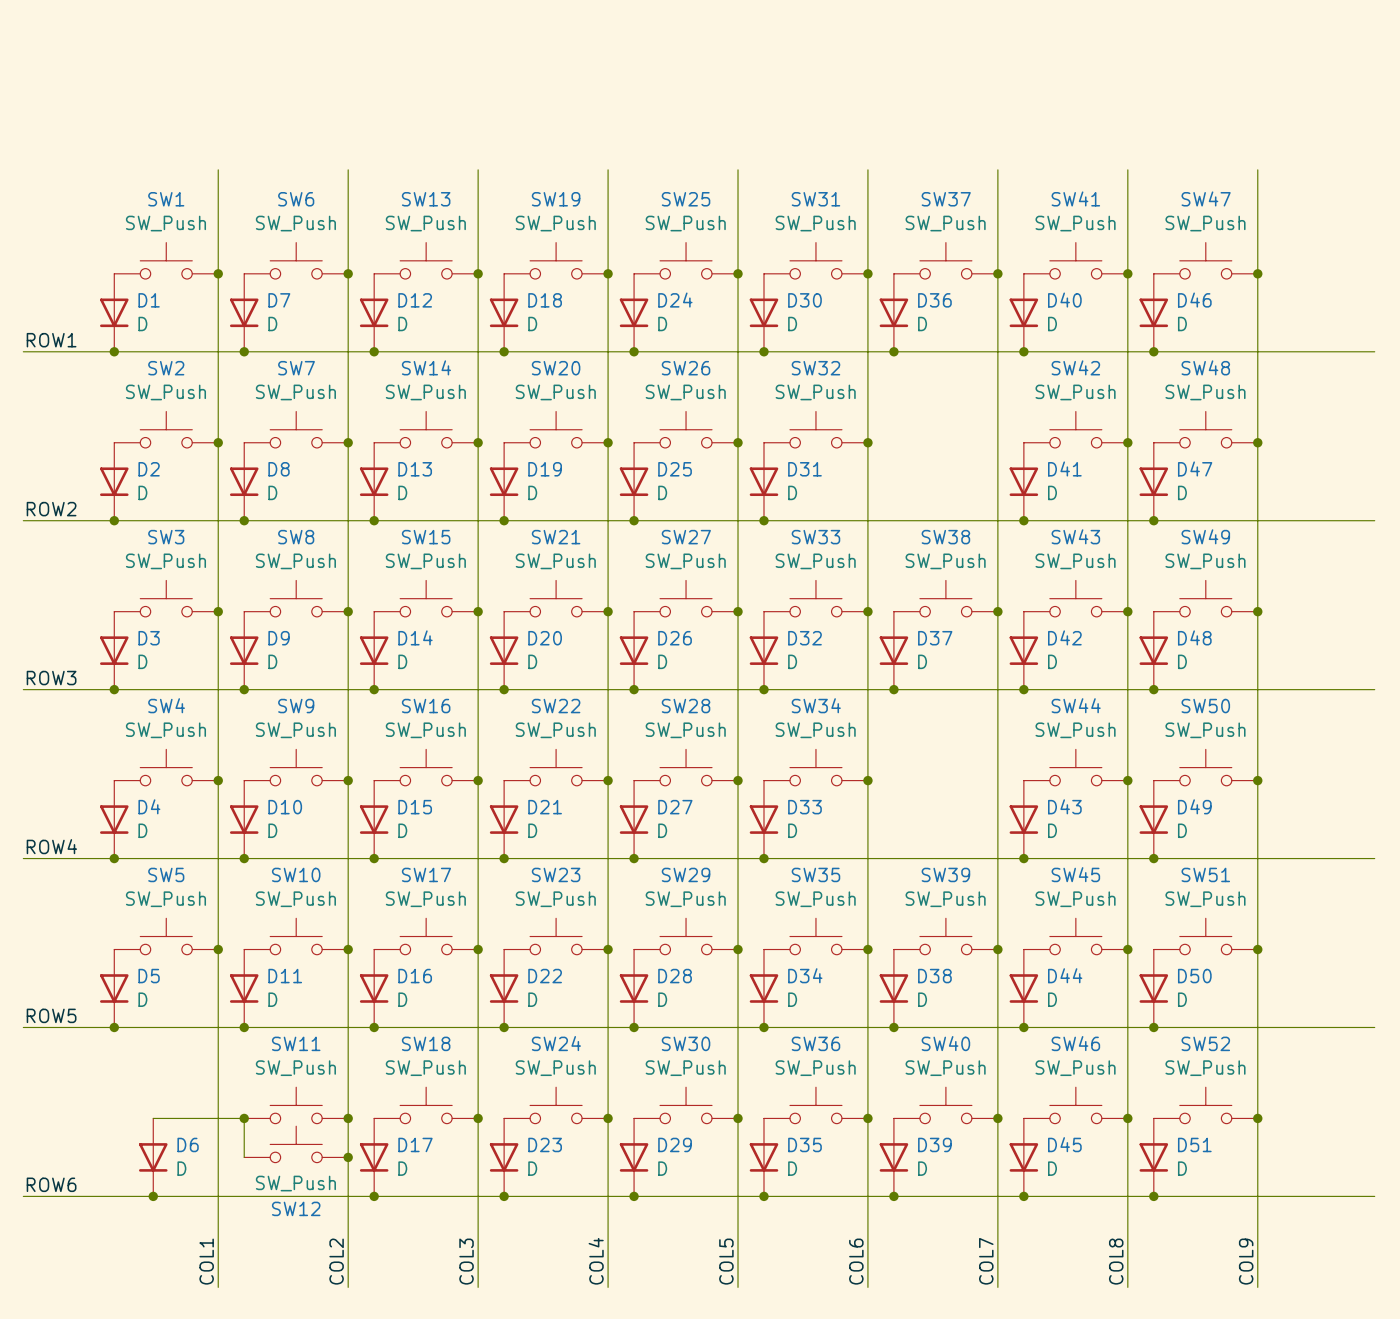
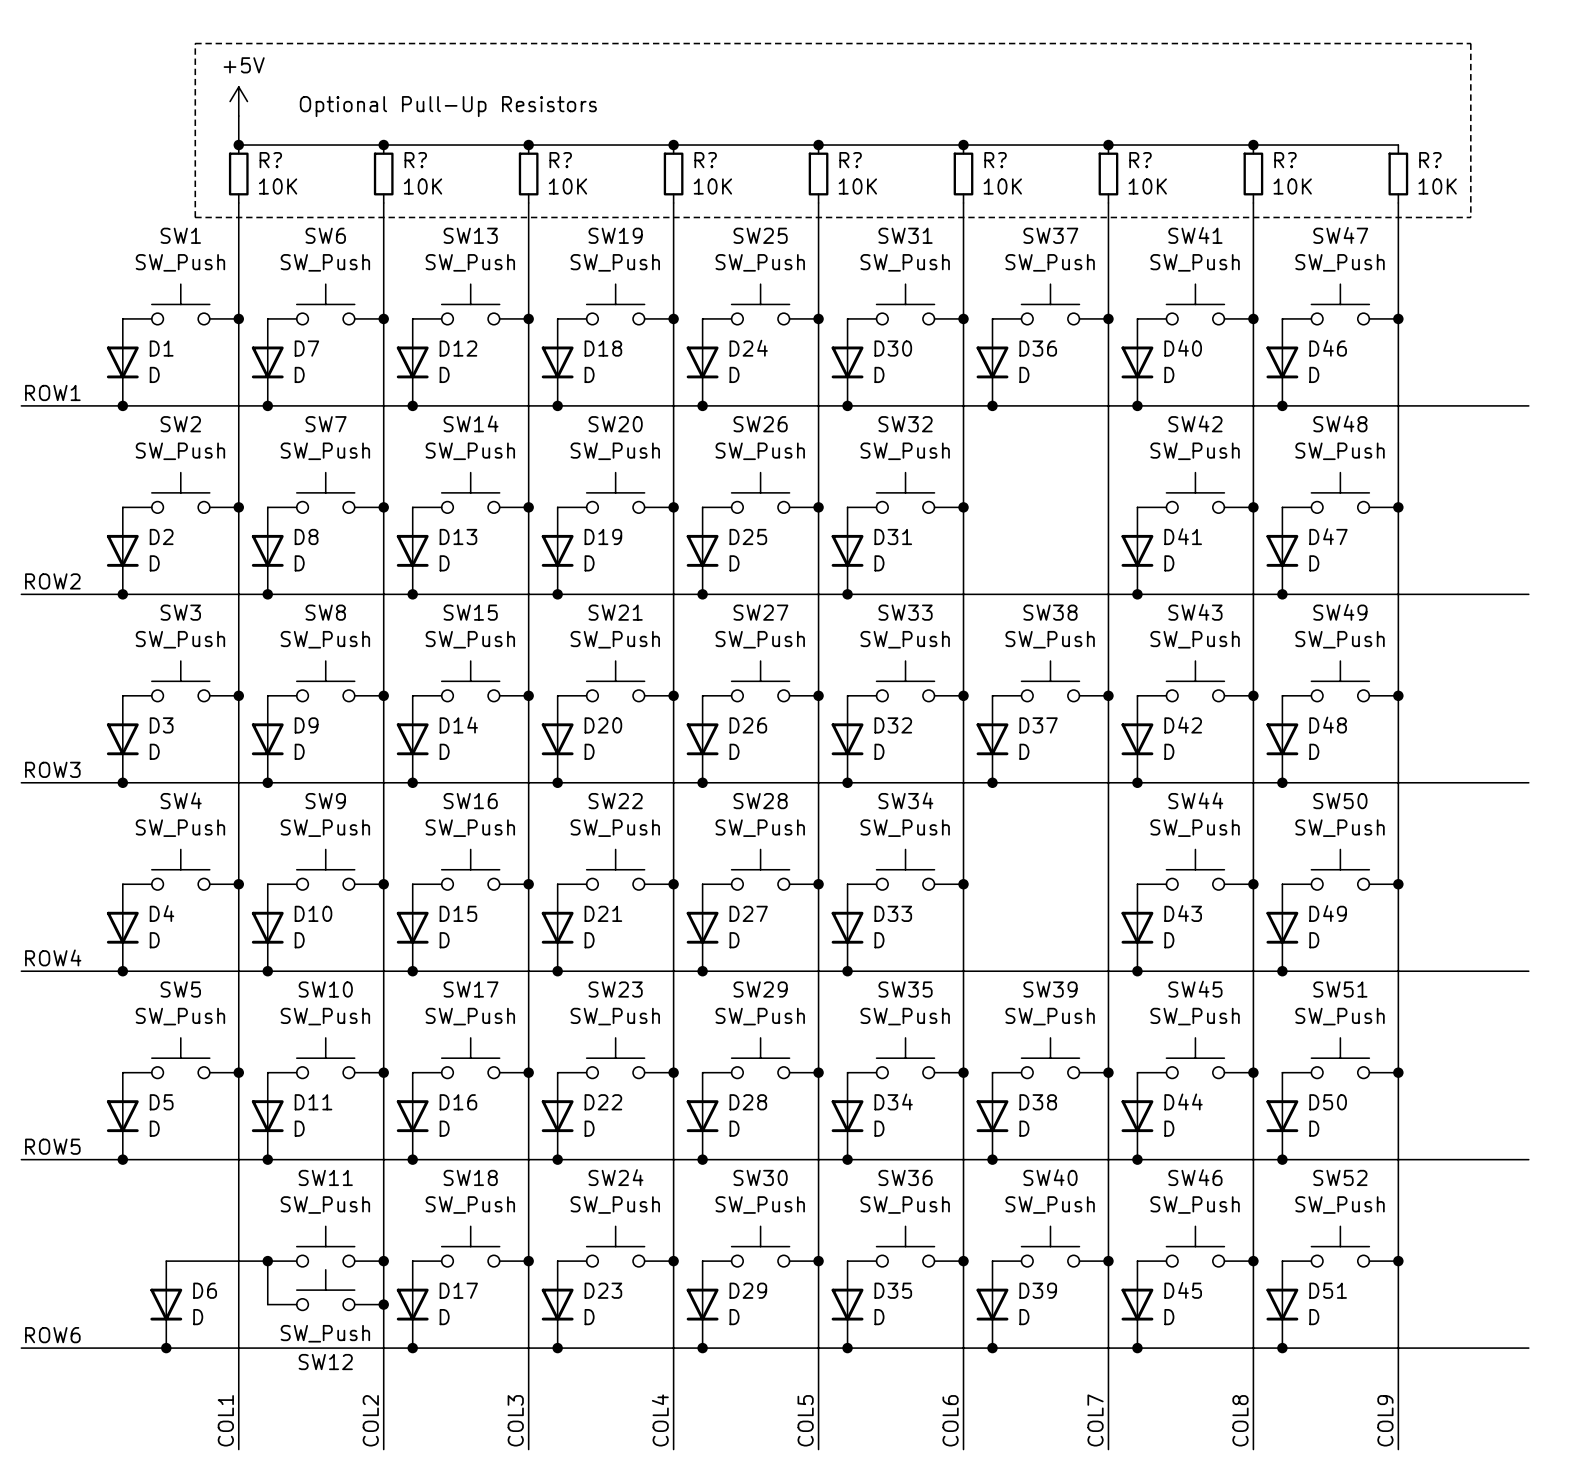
line: none -> (195, 43) (195, 217) (1470, 217) (1470, 43) (195, 43)
power symbol: none -> +5V (238, 101)
text: none -> Optional Pull-Up Resistors (448, 106)
wire: none -> (238, 116) (238, 145) (1398, 145)
junction: none -> (238, 145)
junction: none -> (383, 145)
junction: none -> (528, 145)
junction: none -> (673, 145)
junction: none -> (818, 145)
junction: none -> (963, 145)
junction: none -> (1108, 145)
junction: none -> (1253, 145)
R?: none -> 10K (238, 174)
R?: none -> 10K (383, 174)
R?: none -> 10K (528, 174)
R?: none -> 10K (673, 174)
R?: none -> 10K (818, 174)
R?: none -> 10K (963, 174)
R?: none -> 10K (1108, 174)
R?: none -> 10K (1253, 174)
R?: none -> 10K (1398, 174)

